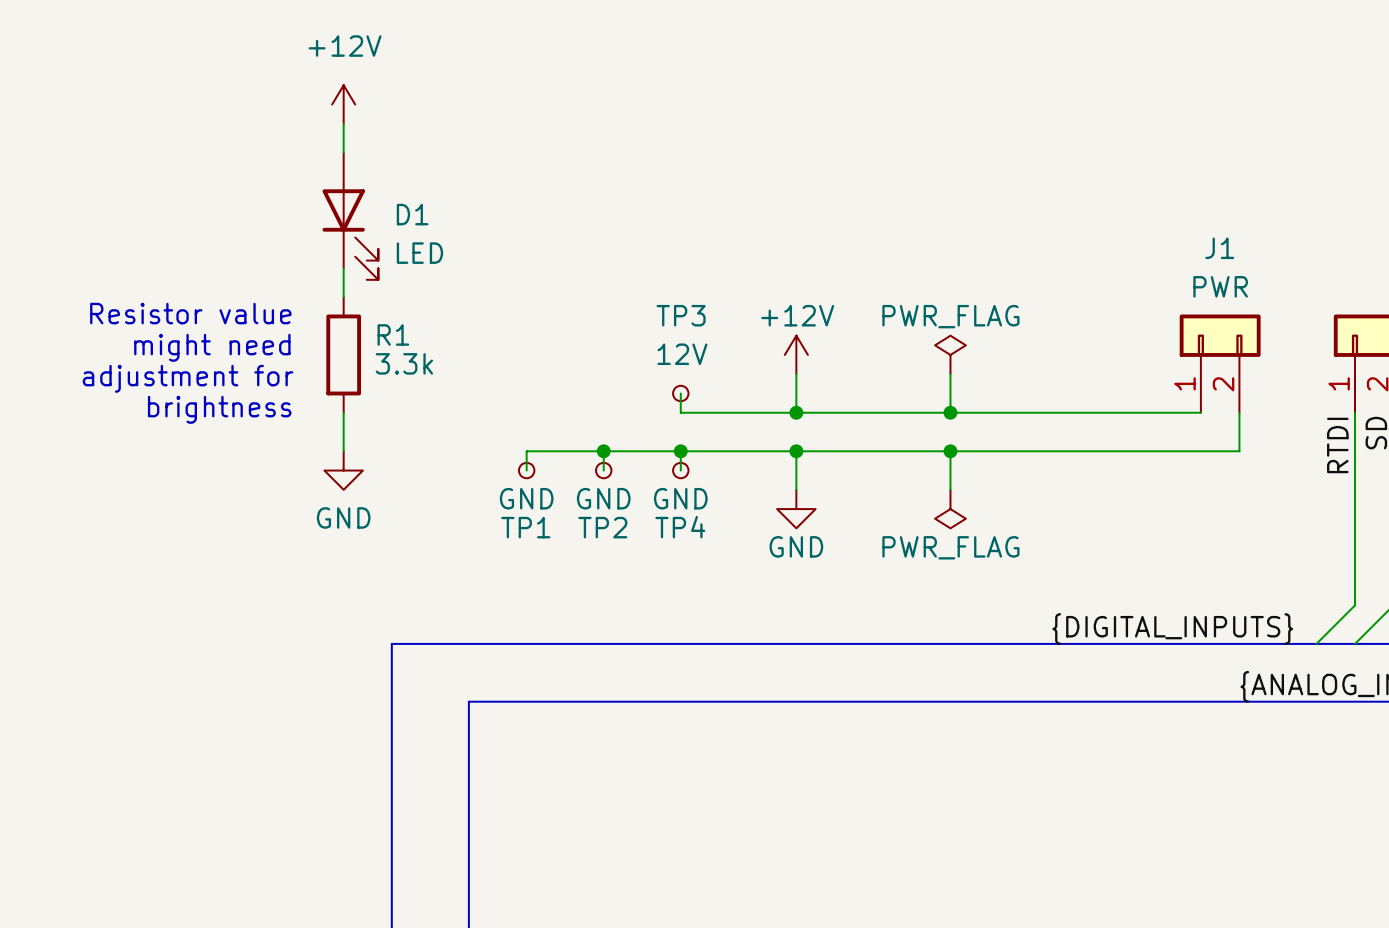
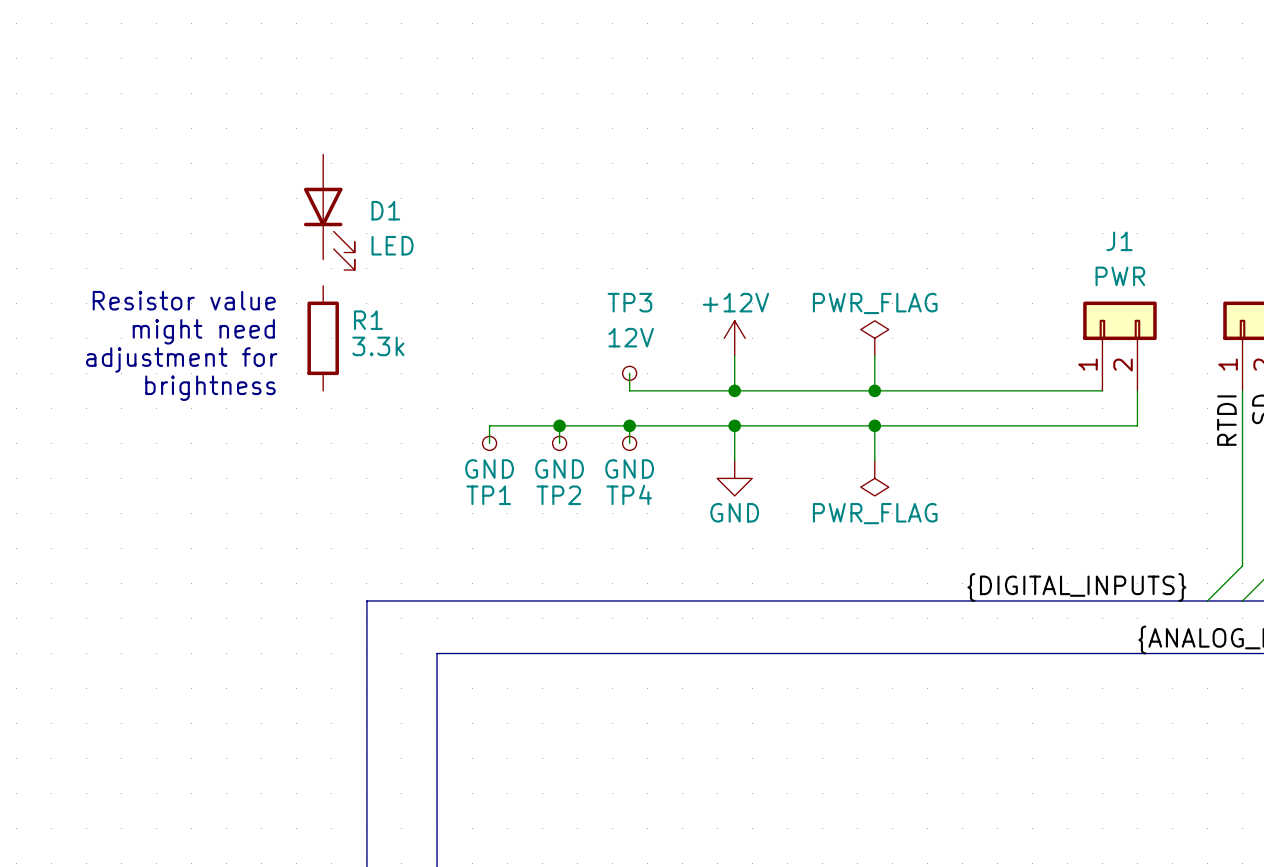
power symbol: +12V (343, 104) -> none
wire: (343, 123) (343, 152) -> none
wire: (343, 268) (343, 297) -> none
wire: (343, 412) (343, 451) -> none
power symbol: GND (343, 470) -> none

